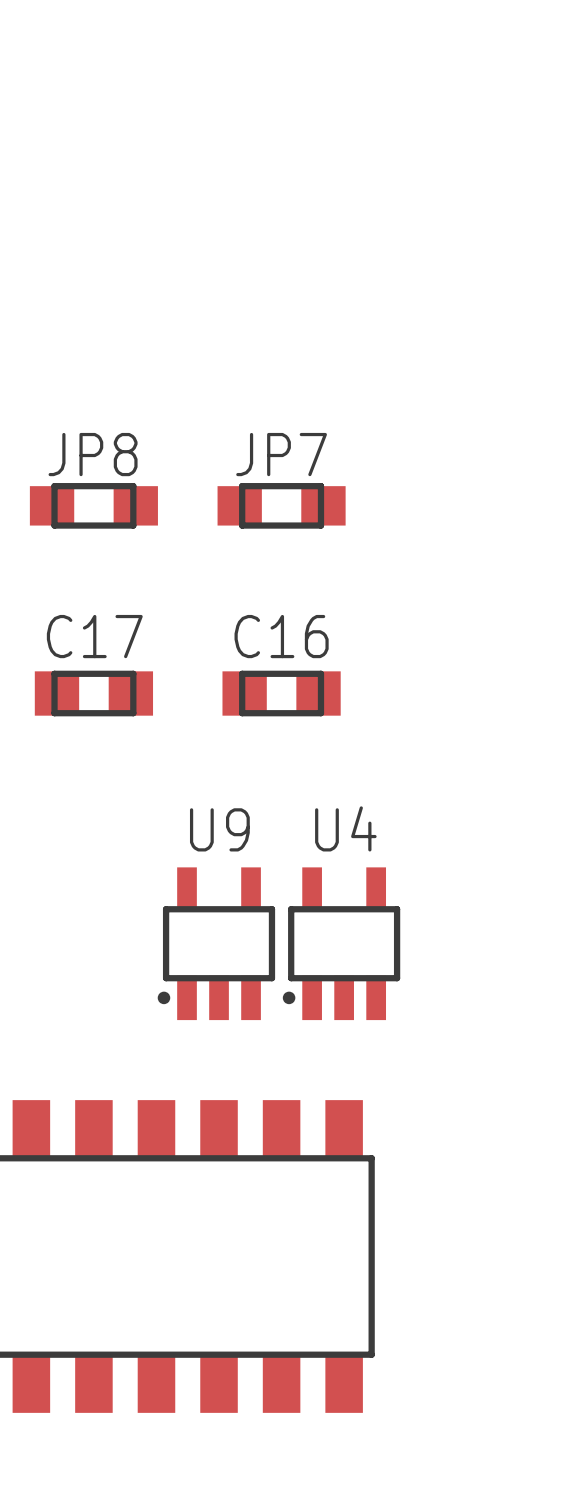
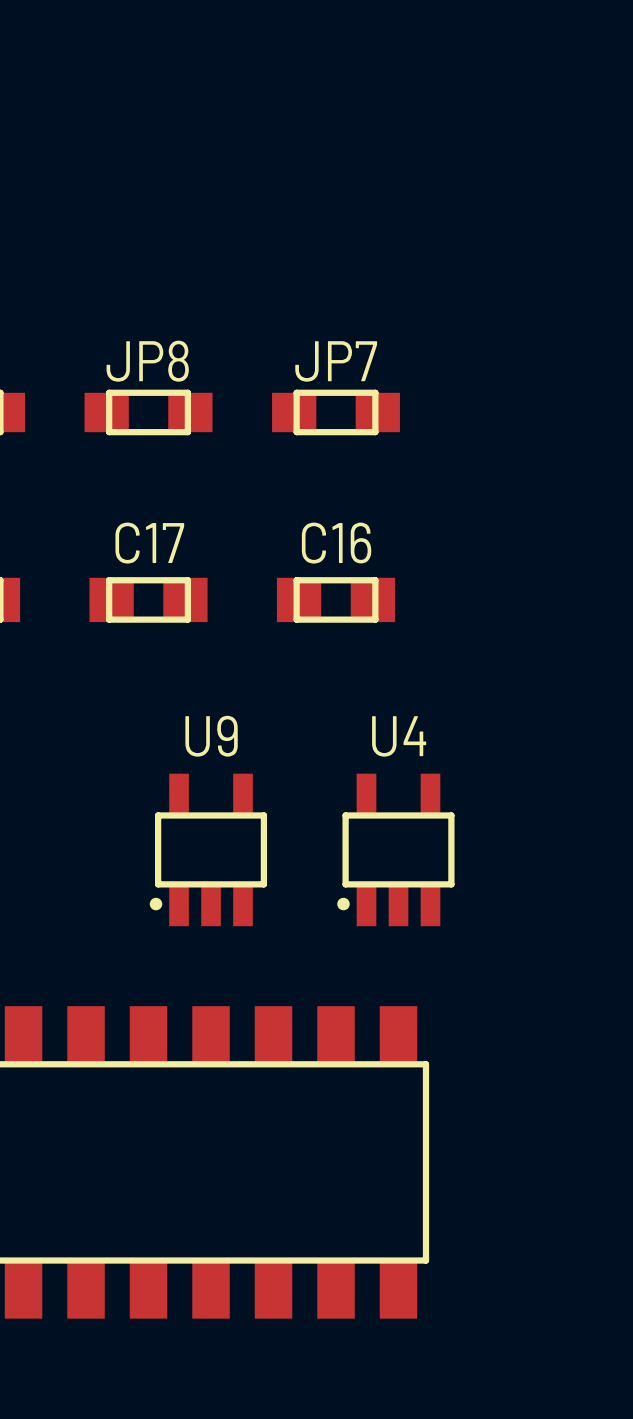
U9 position: (216, 943) -> (208, 849)

